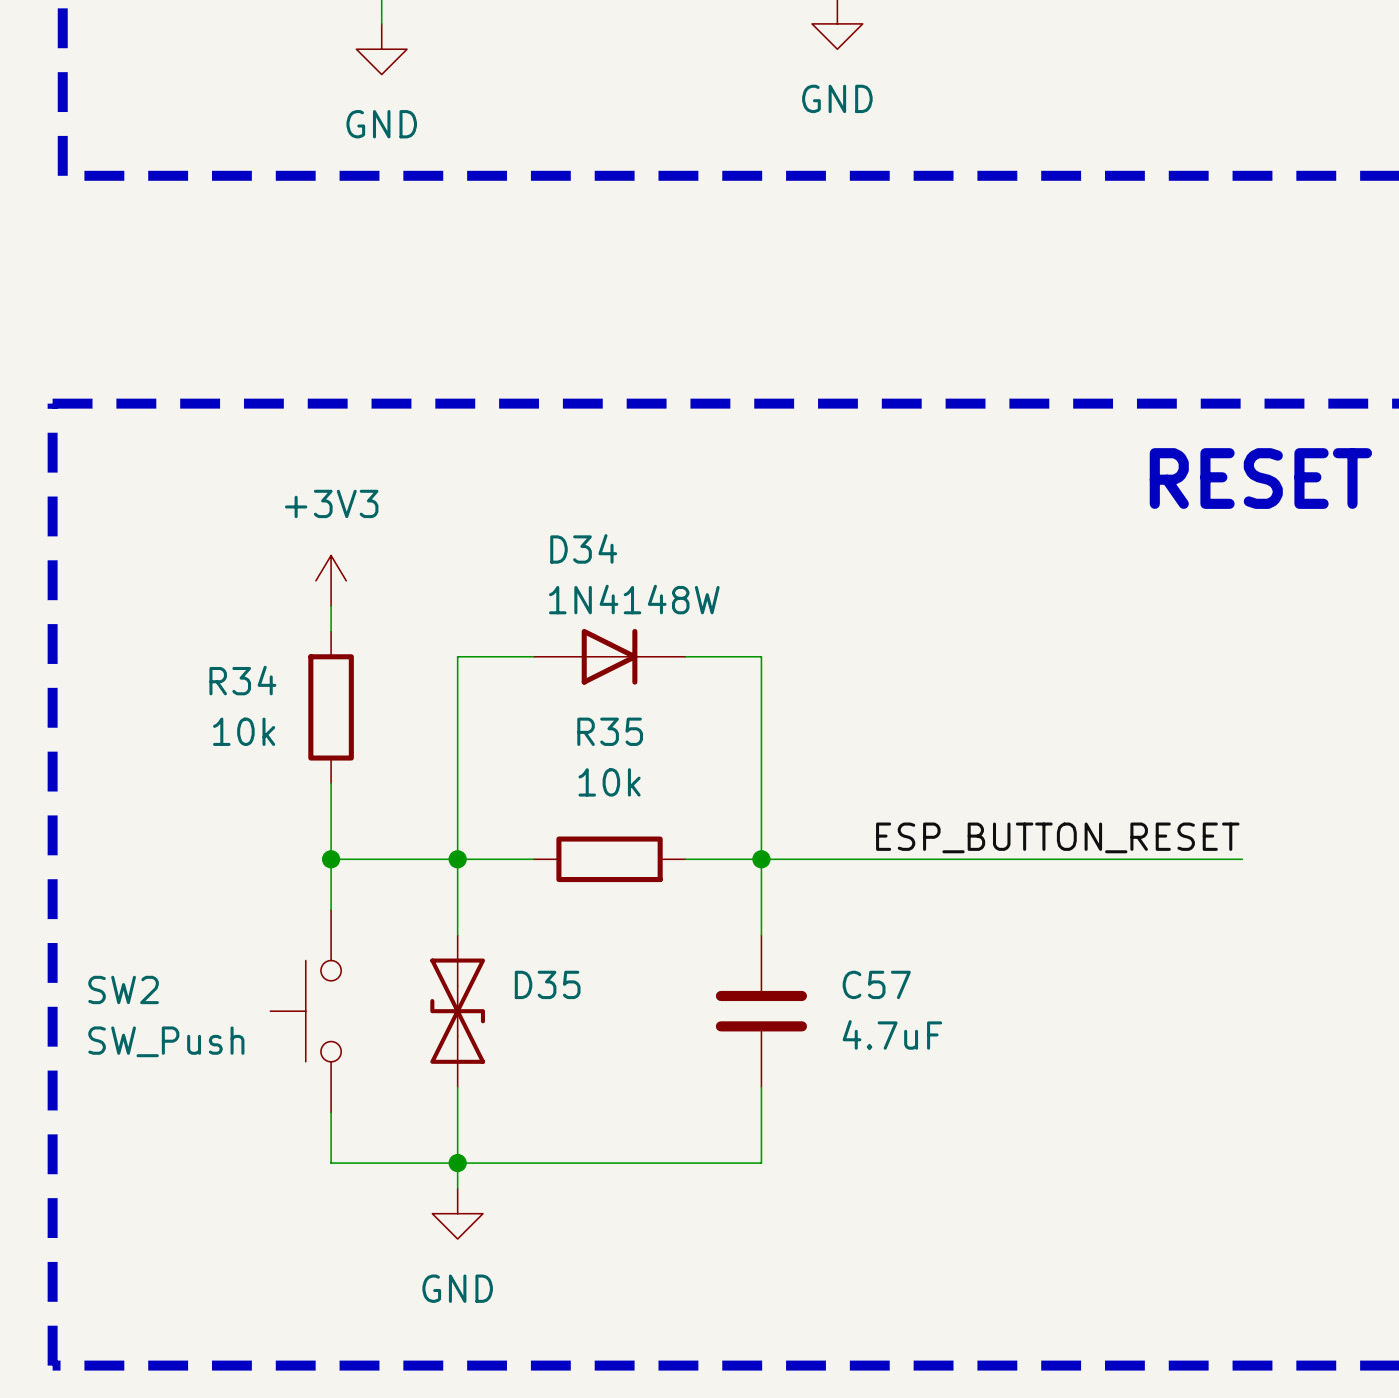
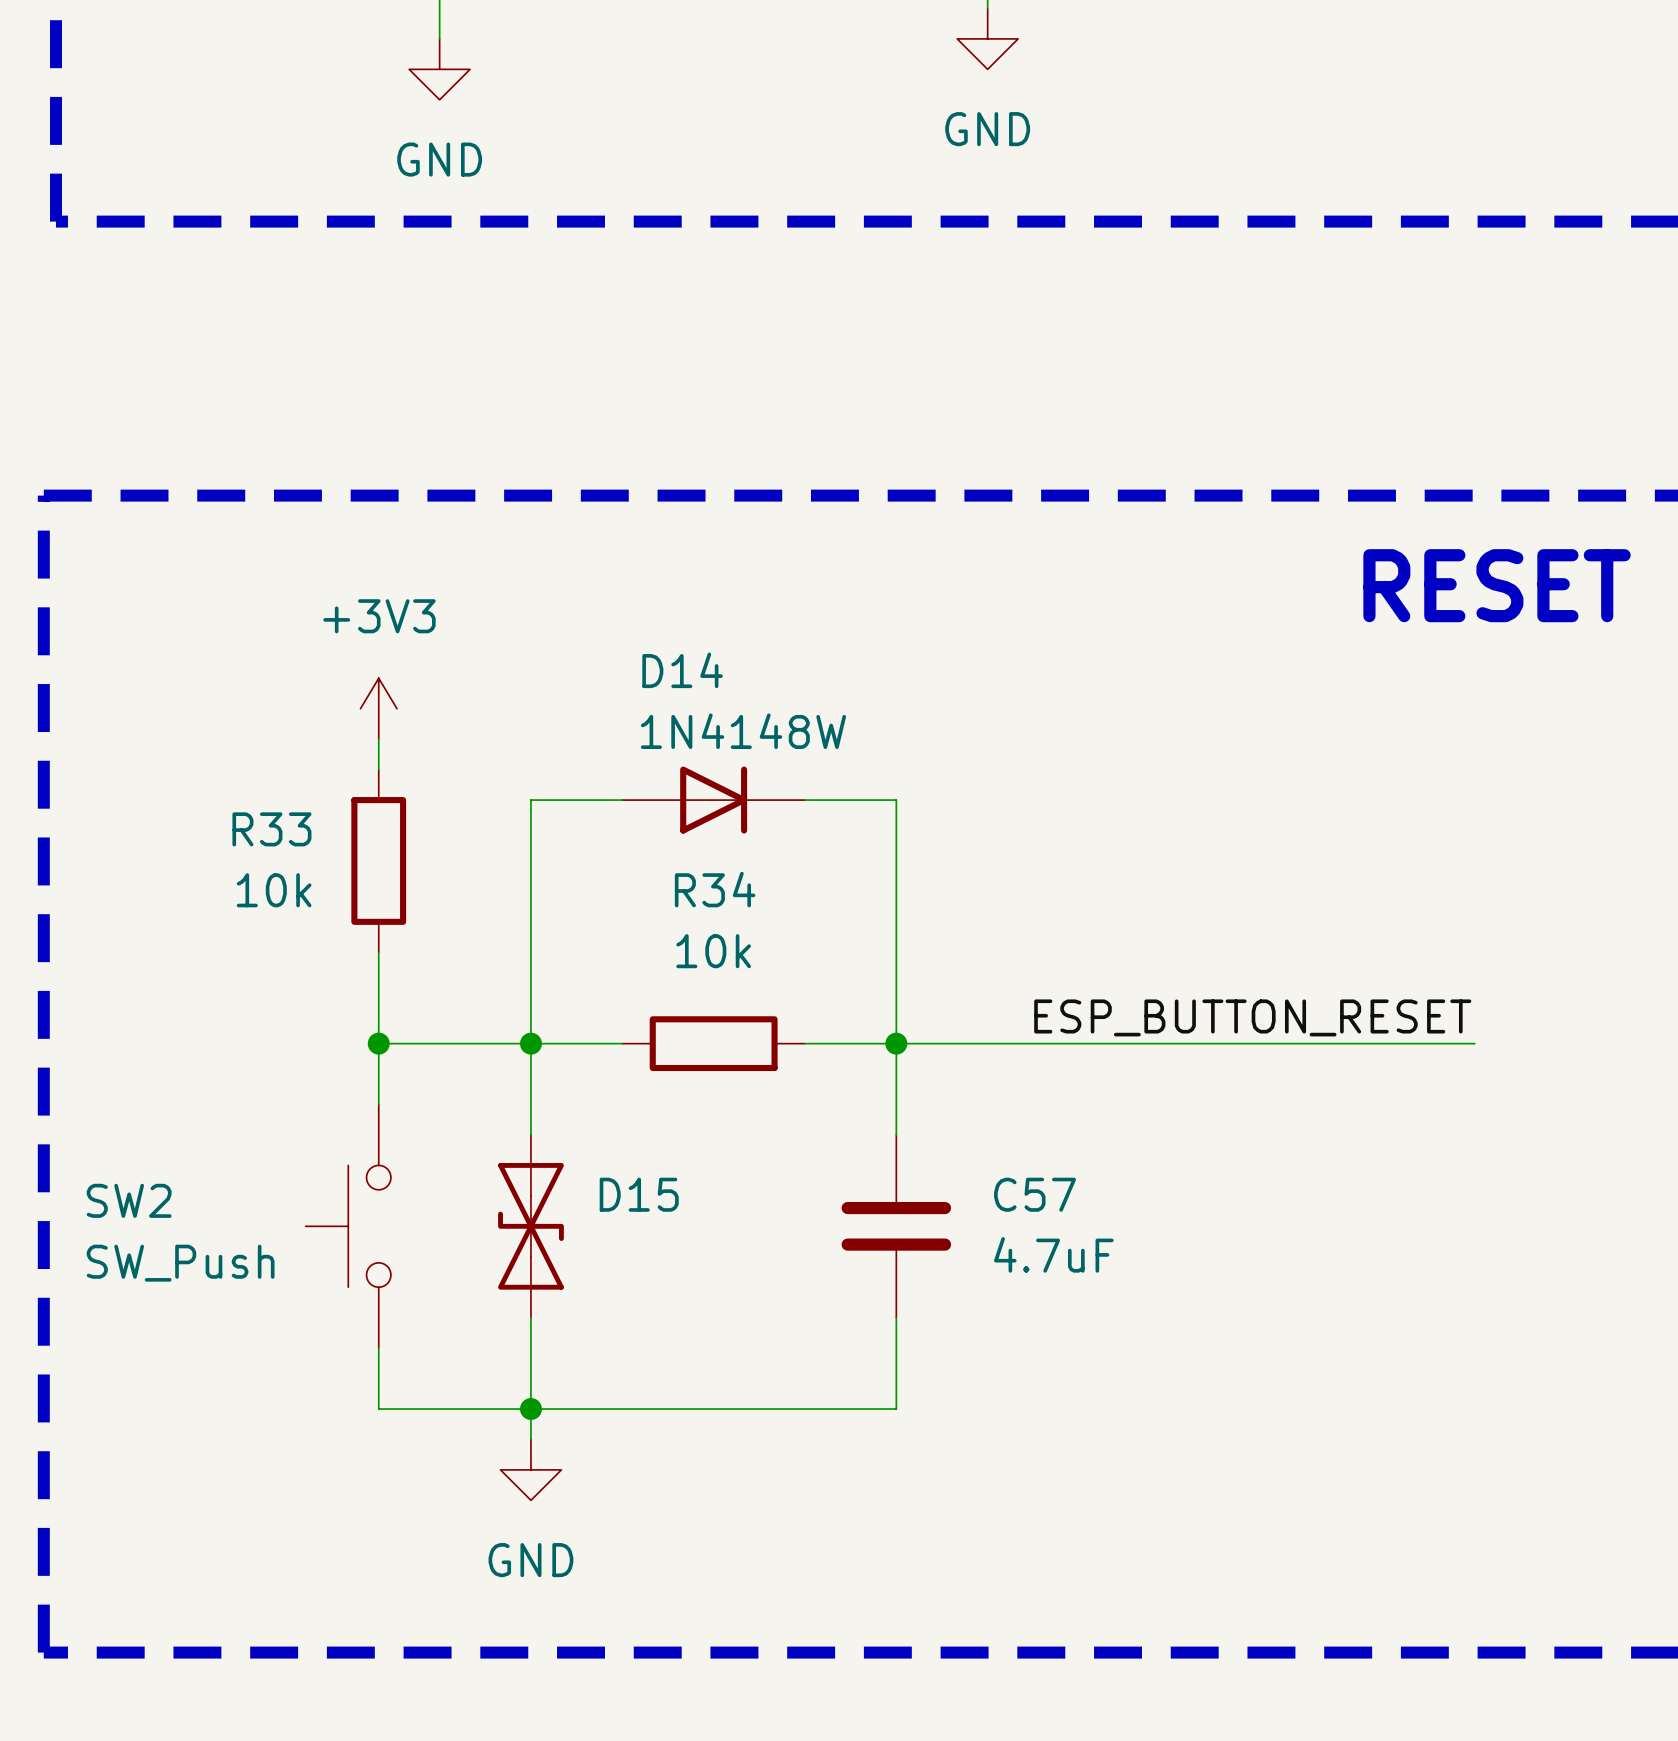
D34 name: D34 (583, 548) -> D14 (682, 670)
R34 name: R34 (242, 680) -> R33 (271, 829)
R35 name: R35 (610, 731) -> R34 (715, 889)
D35 name: D35 (547, 984) -> D15 (639, 1194)

